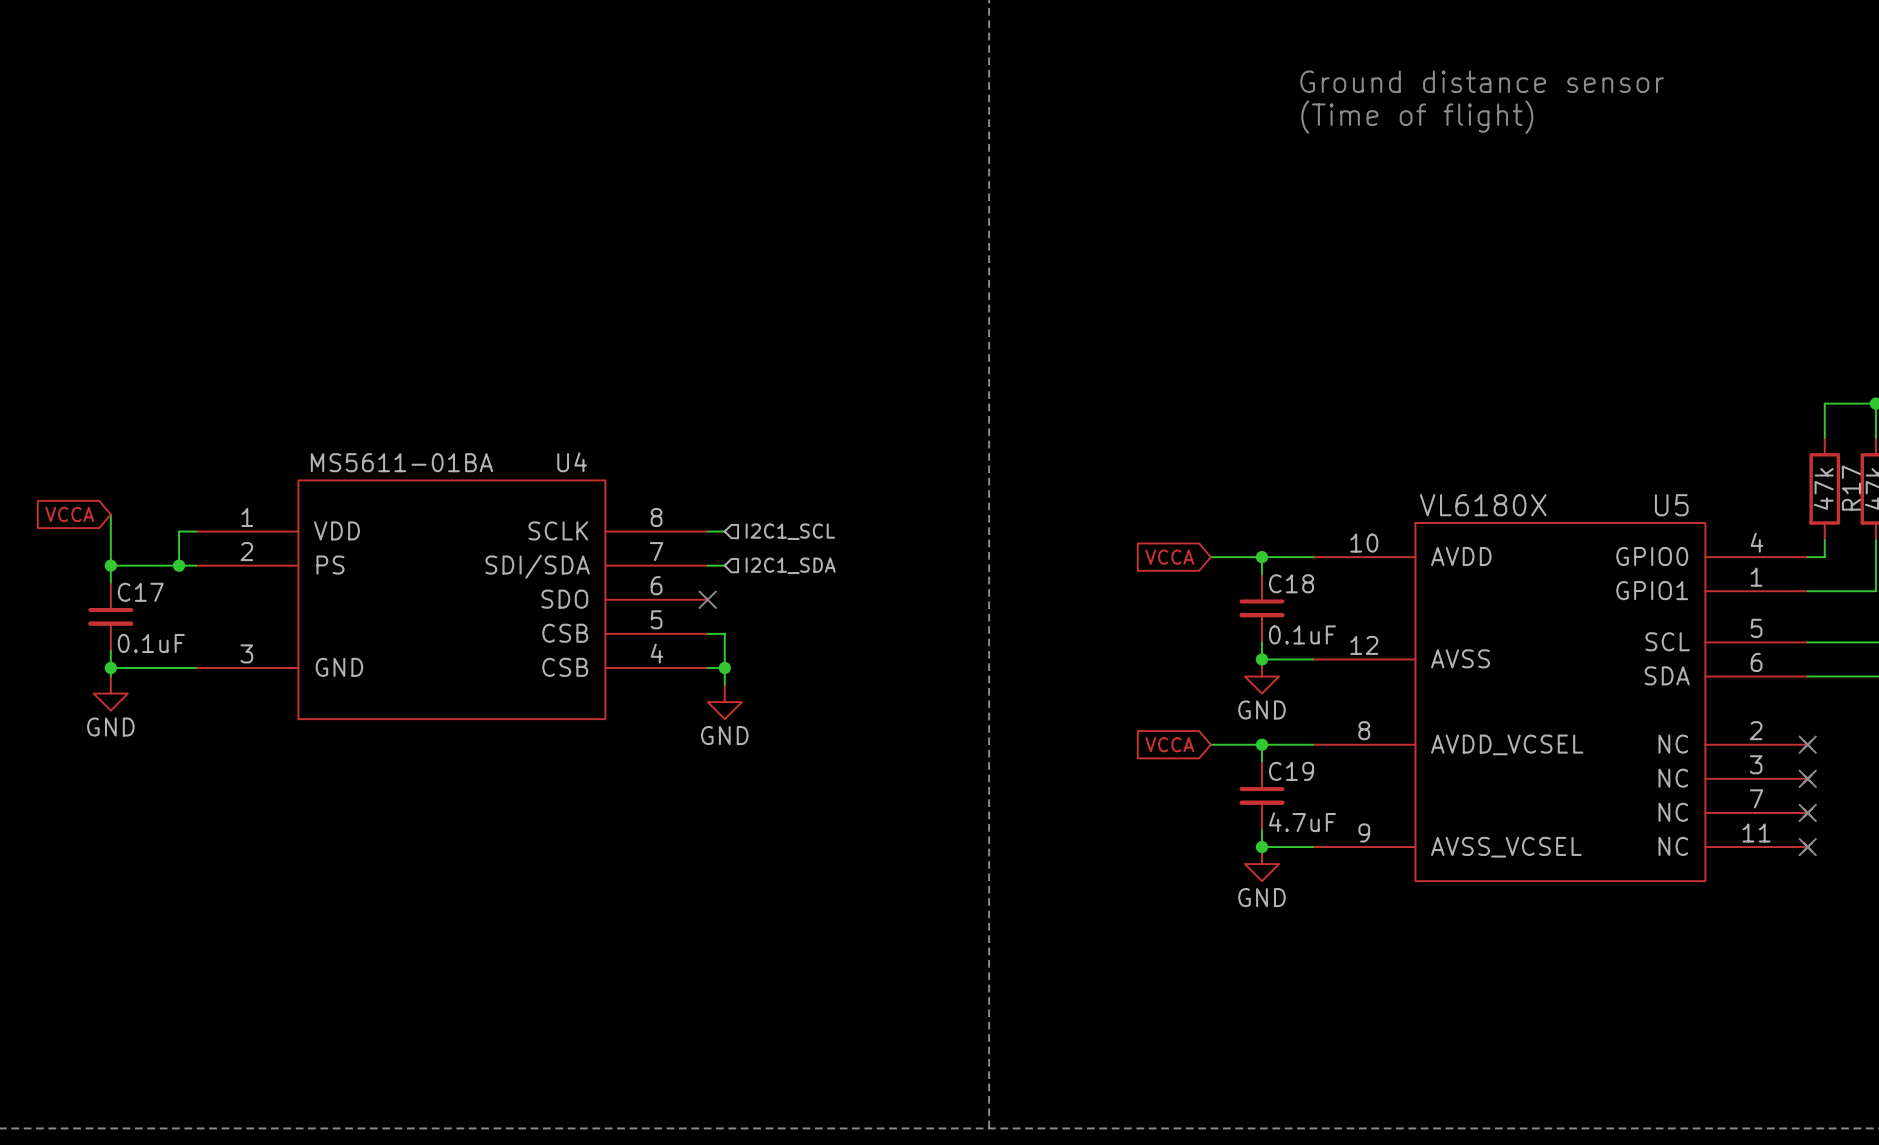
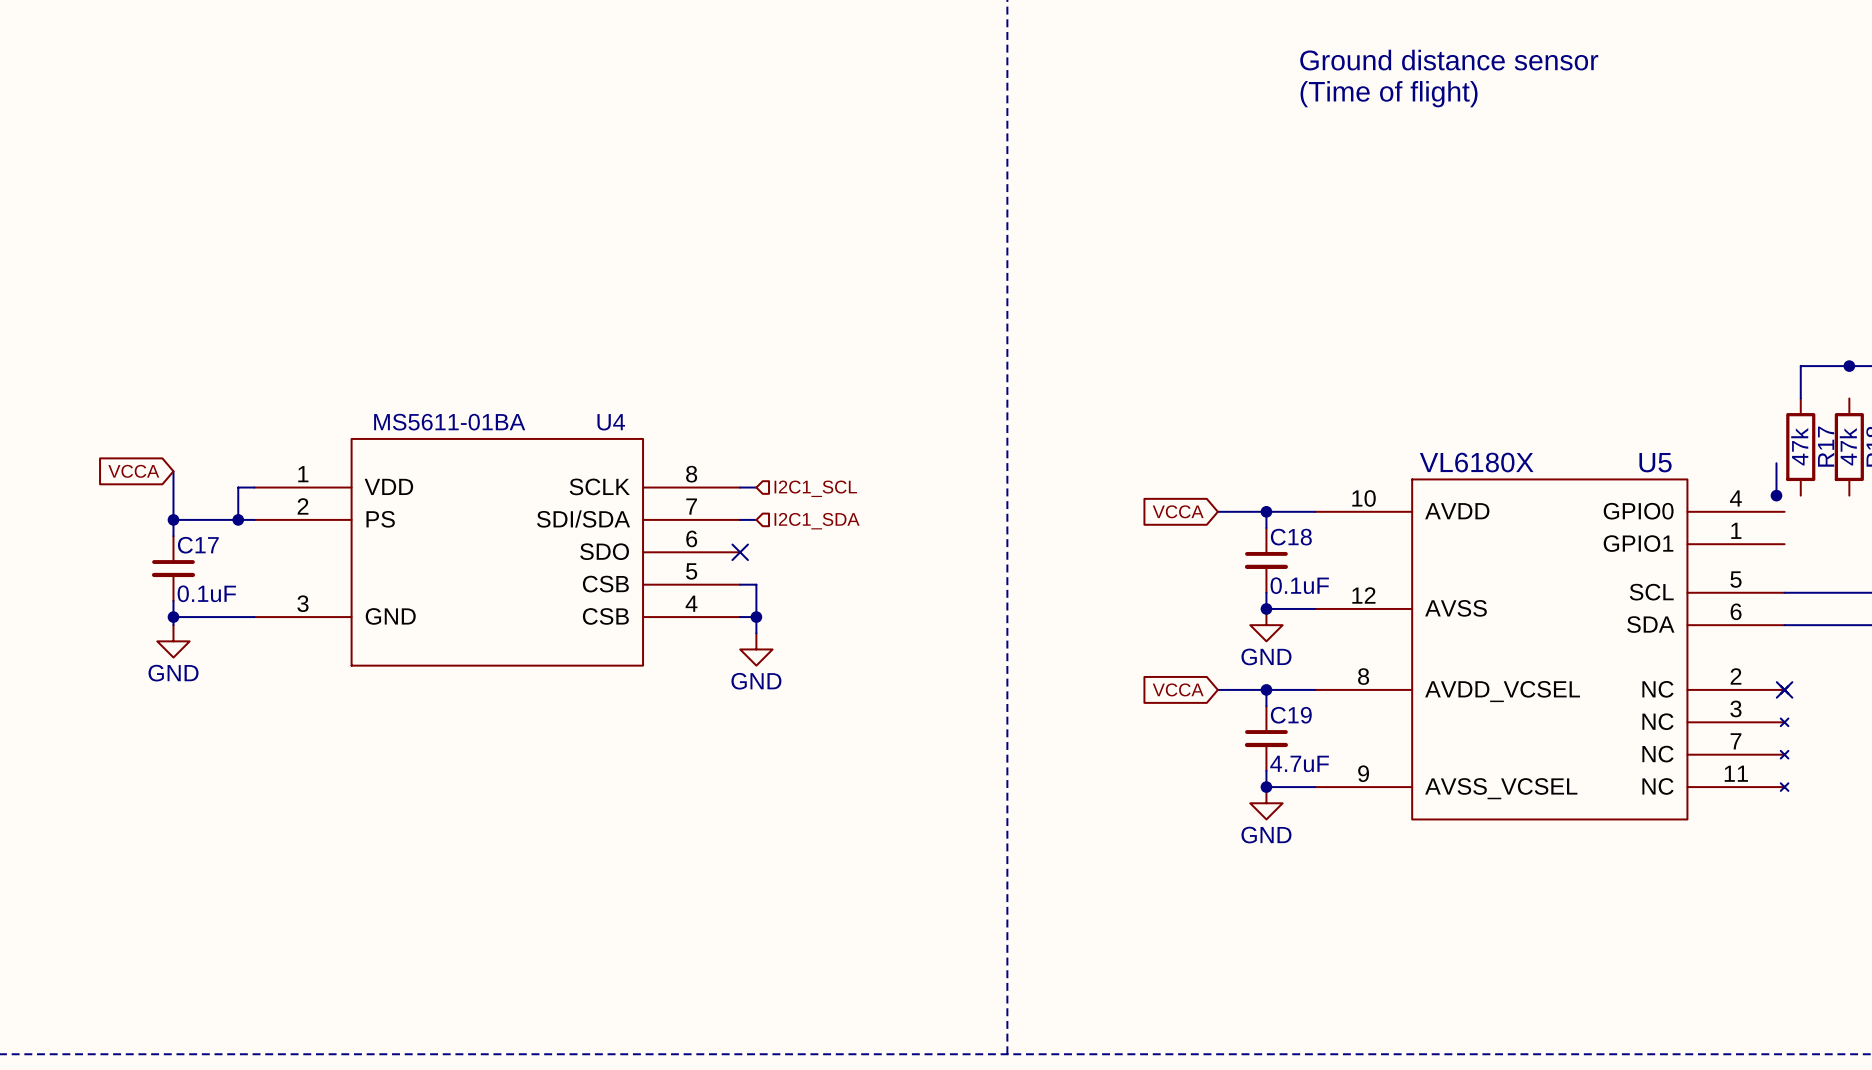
wire: (1875, 403) (1875, 437) -> (1776, 463) (1776, 495)
junction: none -> (1776, 495)
wire: (1824, 540) (1824, 557) (1807, 557) -> none
wire: (1875, 540) (1875, 591) (1807, 591) -> none
no-connect mark: (1807, 778) -> none
no-connect mark: (1807, 812) -> none
no-connect mark: (1807, 847) -> none

